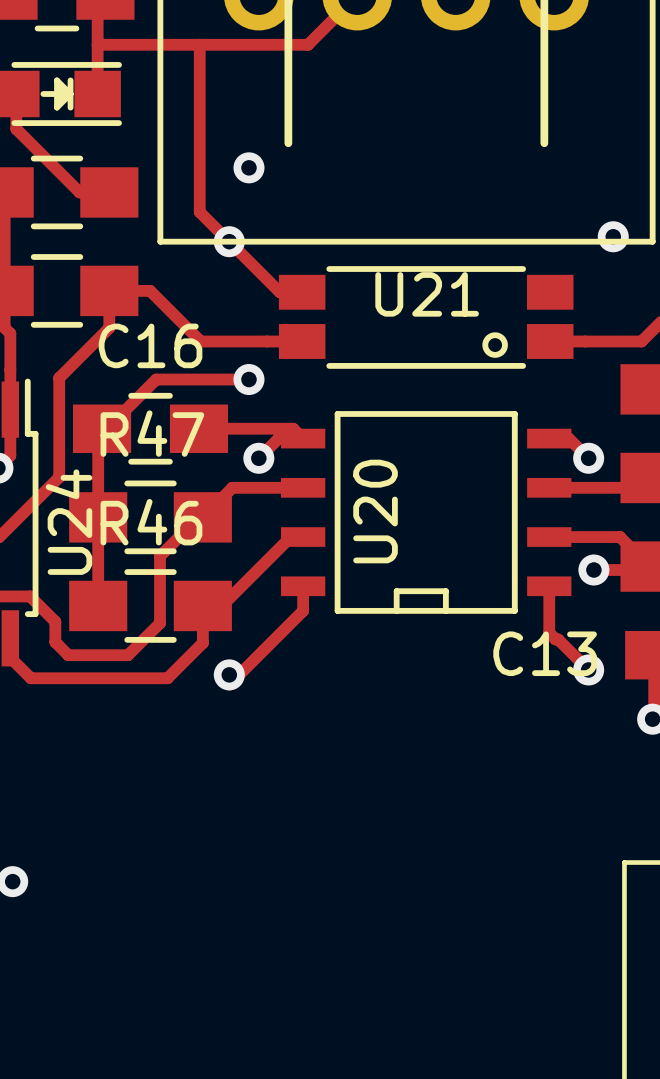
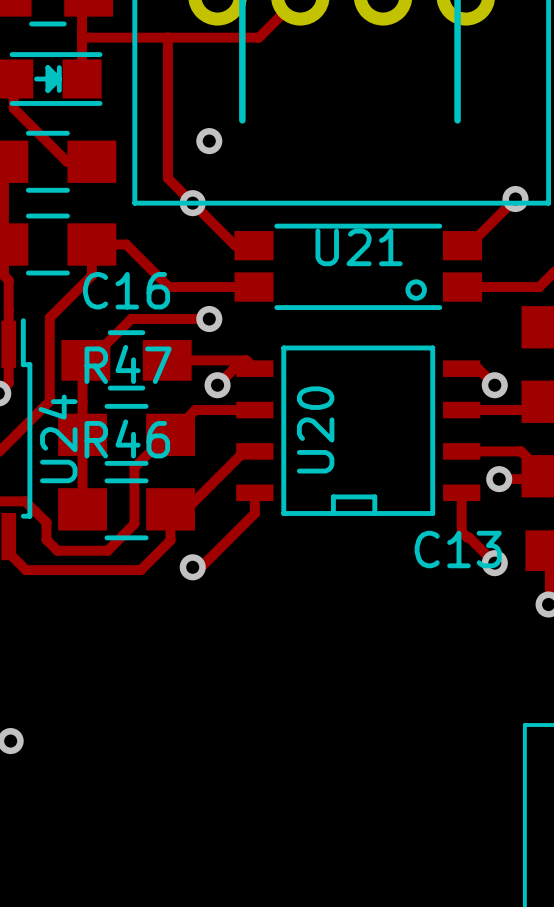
track: none -> (515, 199) (468, 245) (462, 245)

